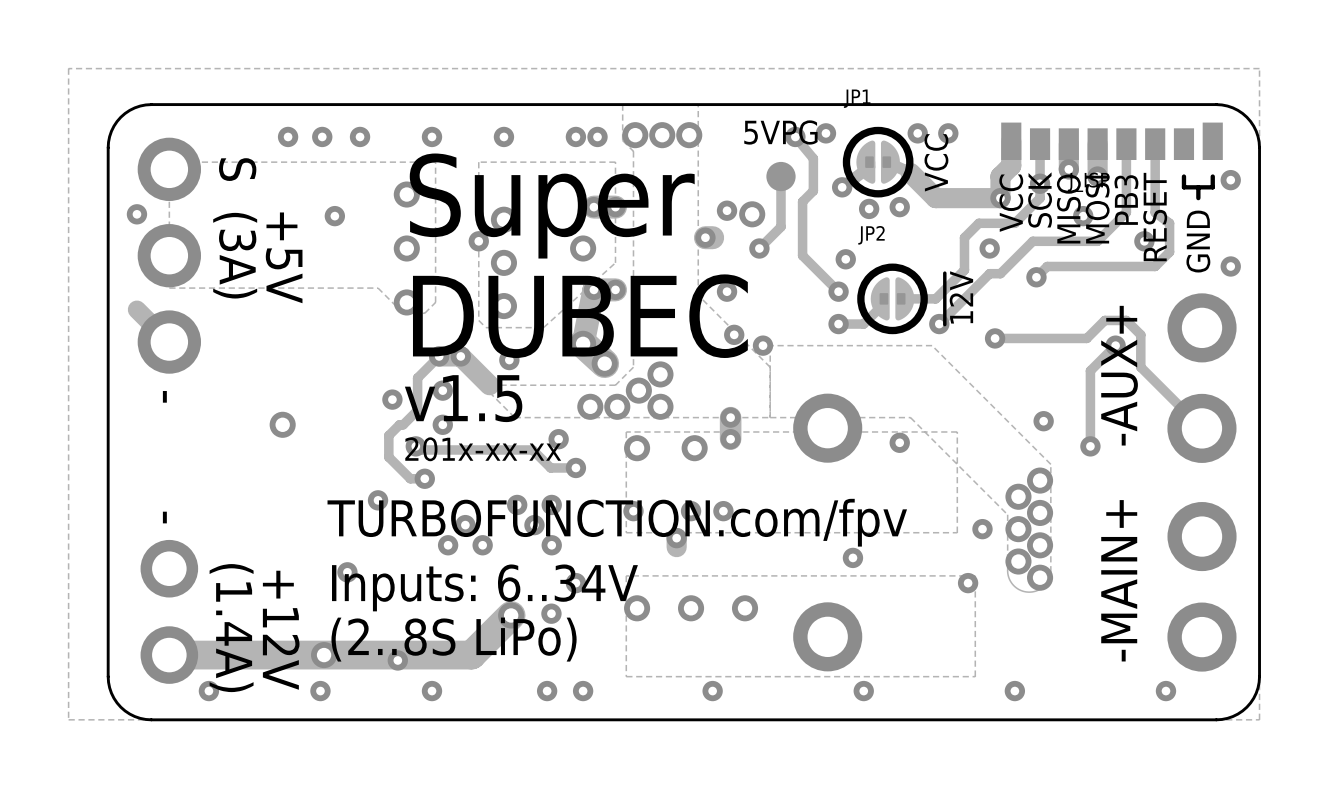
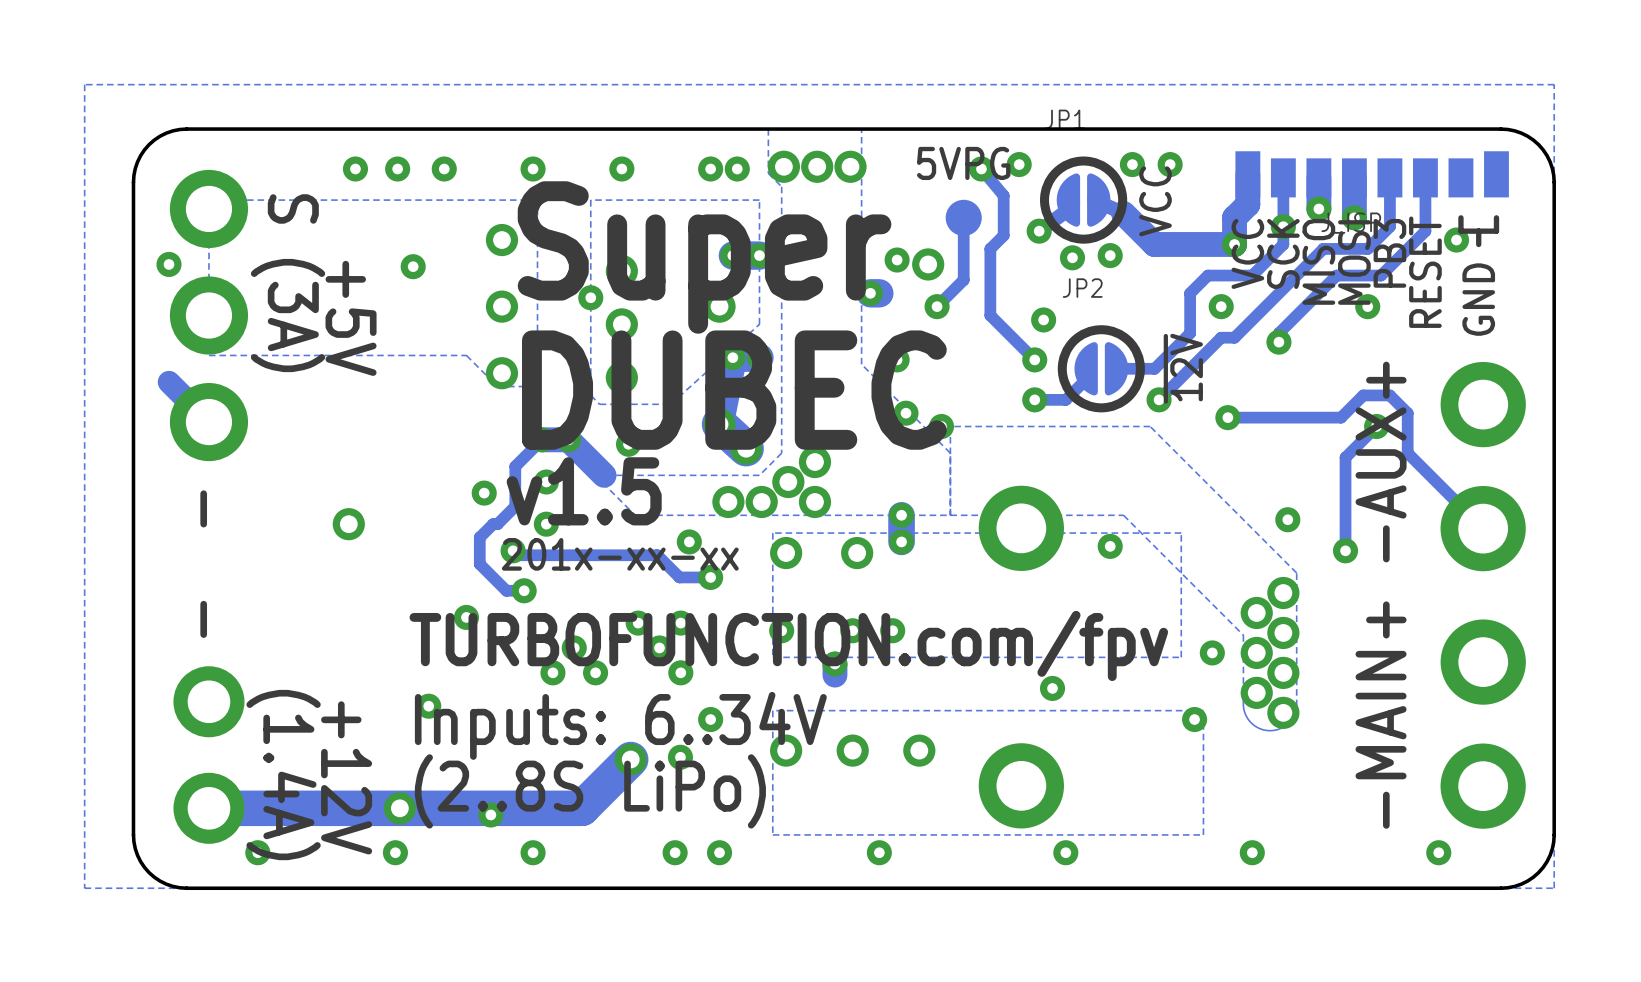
via: (1230, 180) -> none
track: (1126, 183) (1126, 212) (1097, 241) (1032, 241) -> (1389, 226) (1367, 248) (1323, 248) (1274, 297)
track: (1155, 187) (1155, 212) (1169, 223) (1169, 252) (1155, 266) (1047, 266) (1036, 277) -> (1425, 231) (1381, 275) (1336, 275) (1278, 333) (1278, 342)
via: none -> (1456, 240)
via: (1083, 216) -> none
via: (1144, 241) -> none
via: none -> (1367, 306)
via: (1230, 266) -> none

